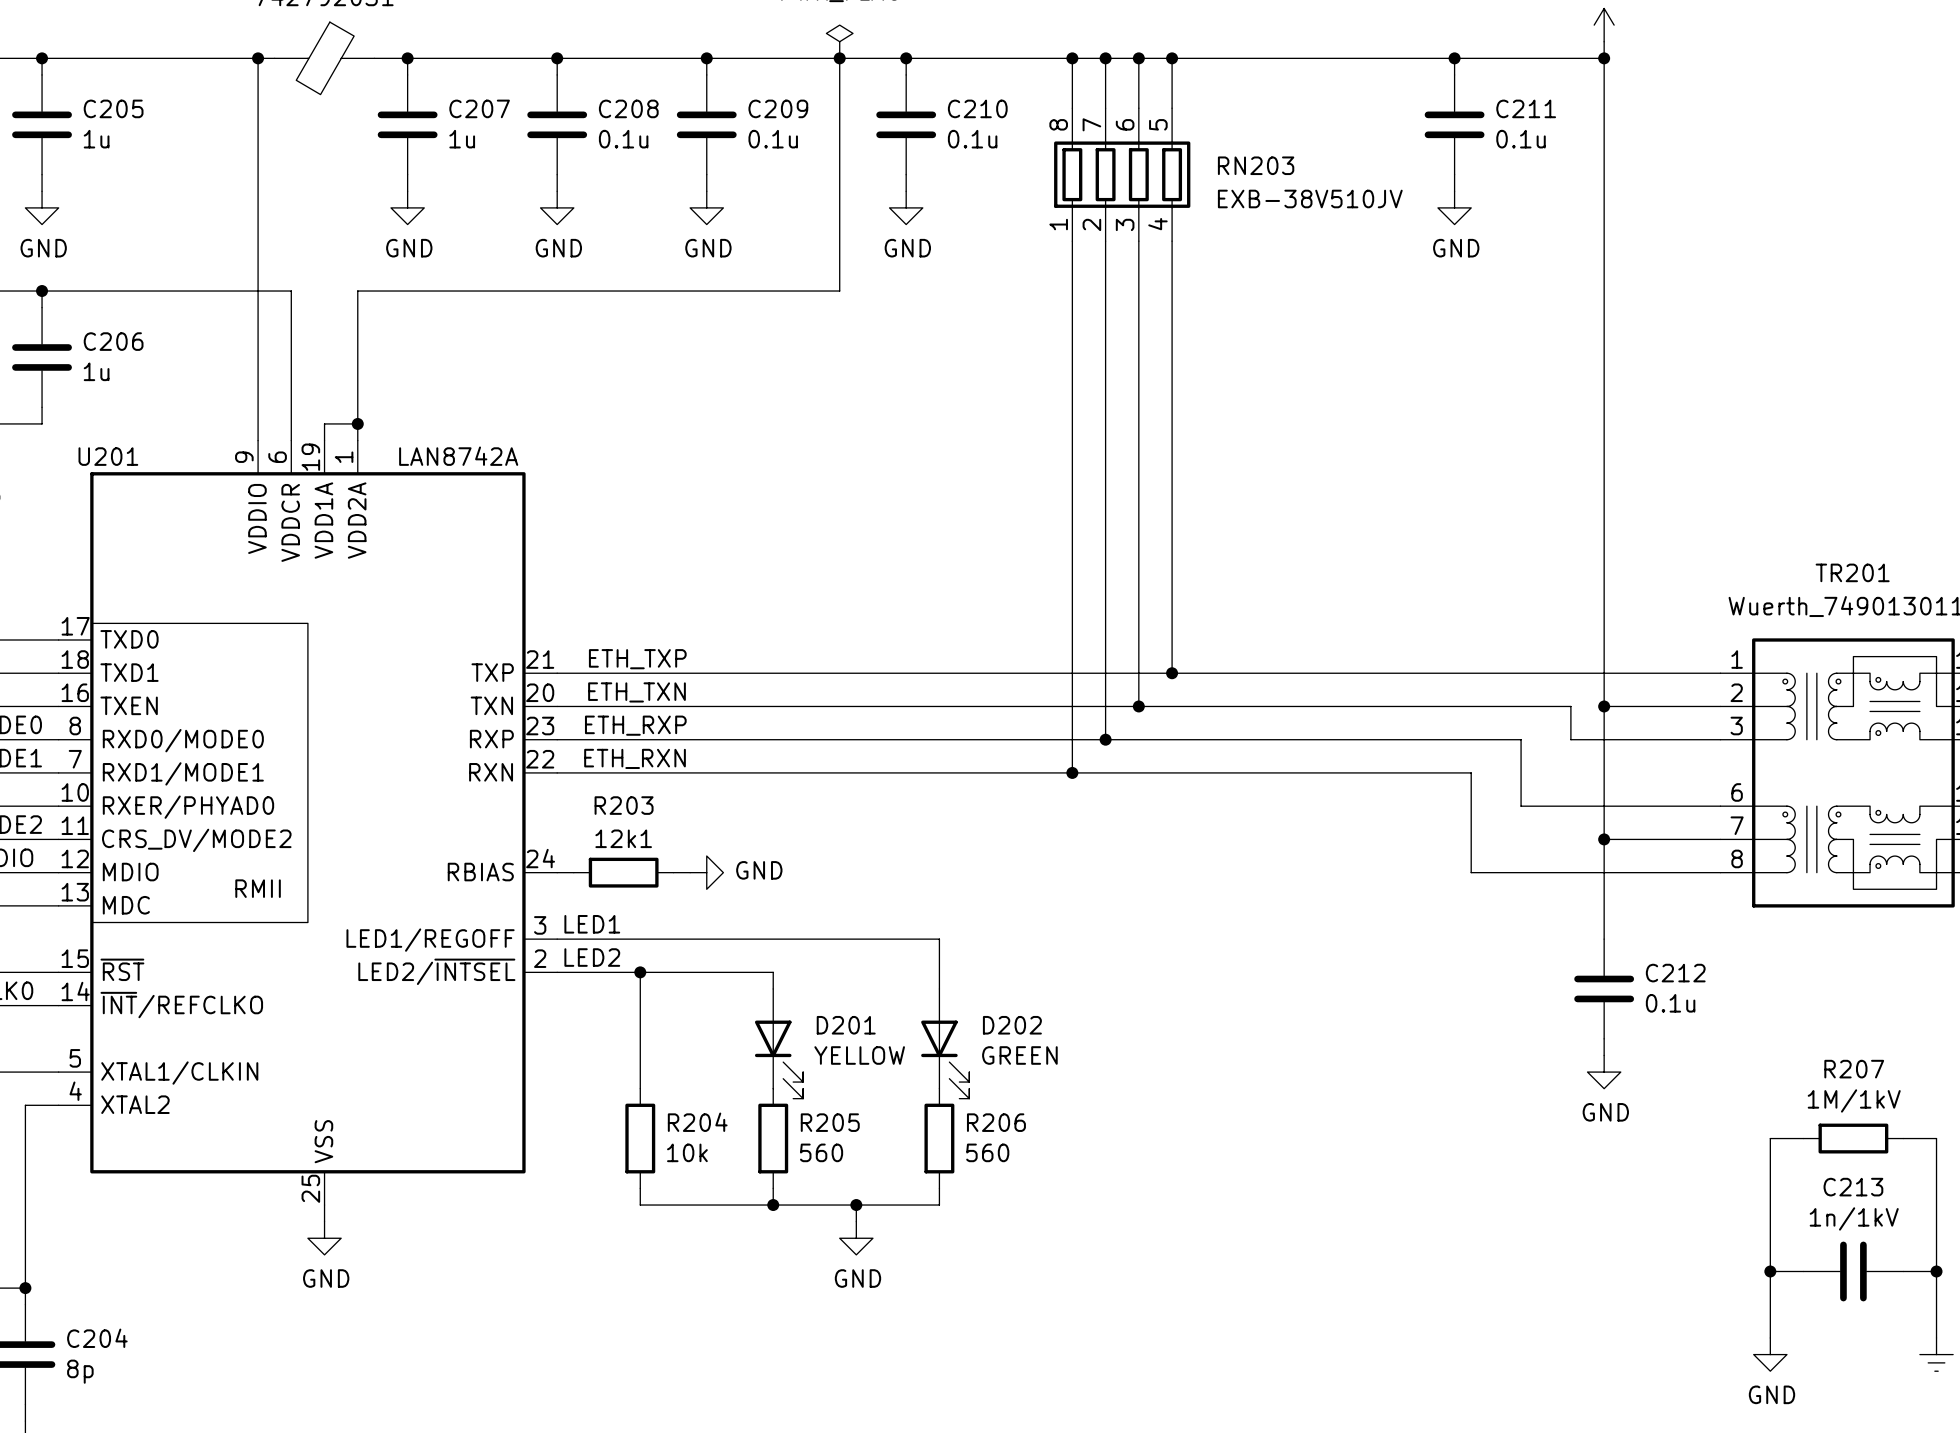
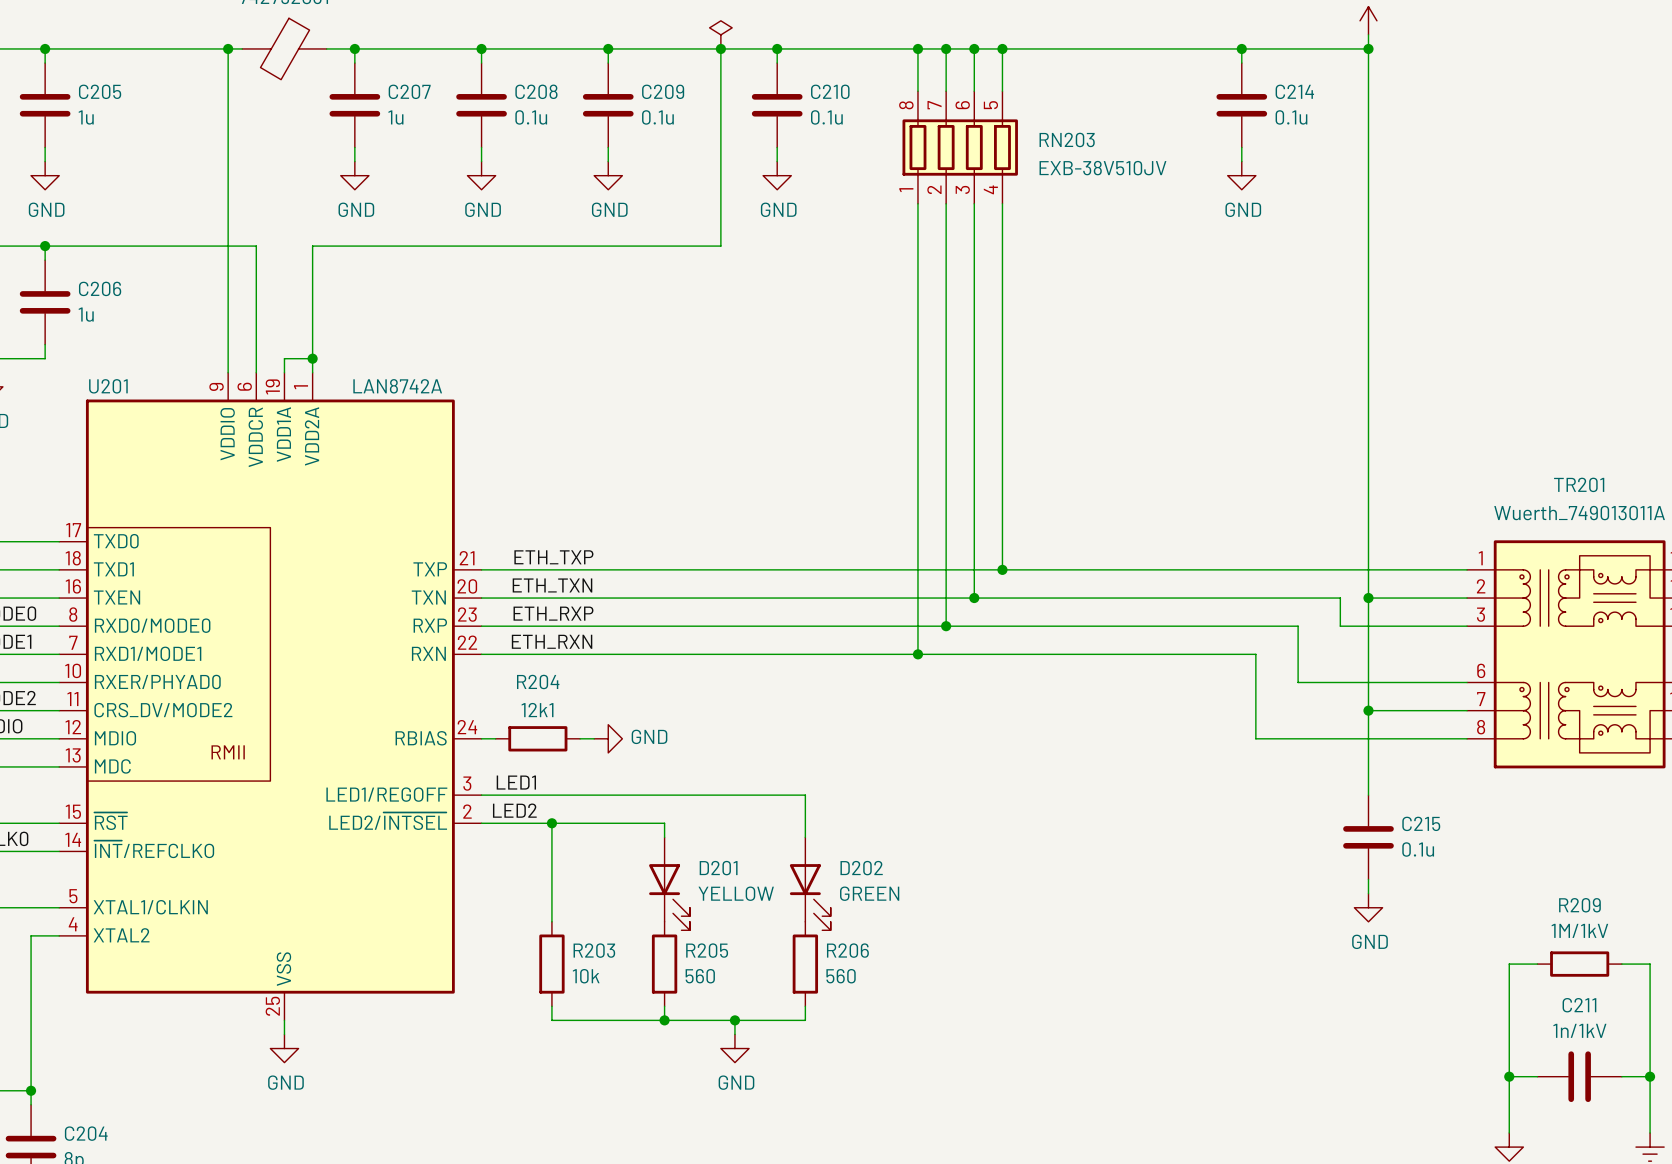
C211 name: C211 (1526, 108) -> C214 (1294, 91)
R203 name: R203 (624, 805) -> R204 (538, 681)
C212 name: C212 (1675, 973) -> C215 (1421, 823)
R207 name: R207 (1854, 1069) -> R209 (1579, 905)
R204 name: R204 (697, 1122) -> R203 (594, 950)
C213 name: C213 (1853, 1187) -> C211 (1579, 1005)

